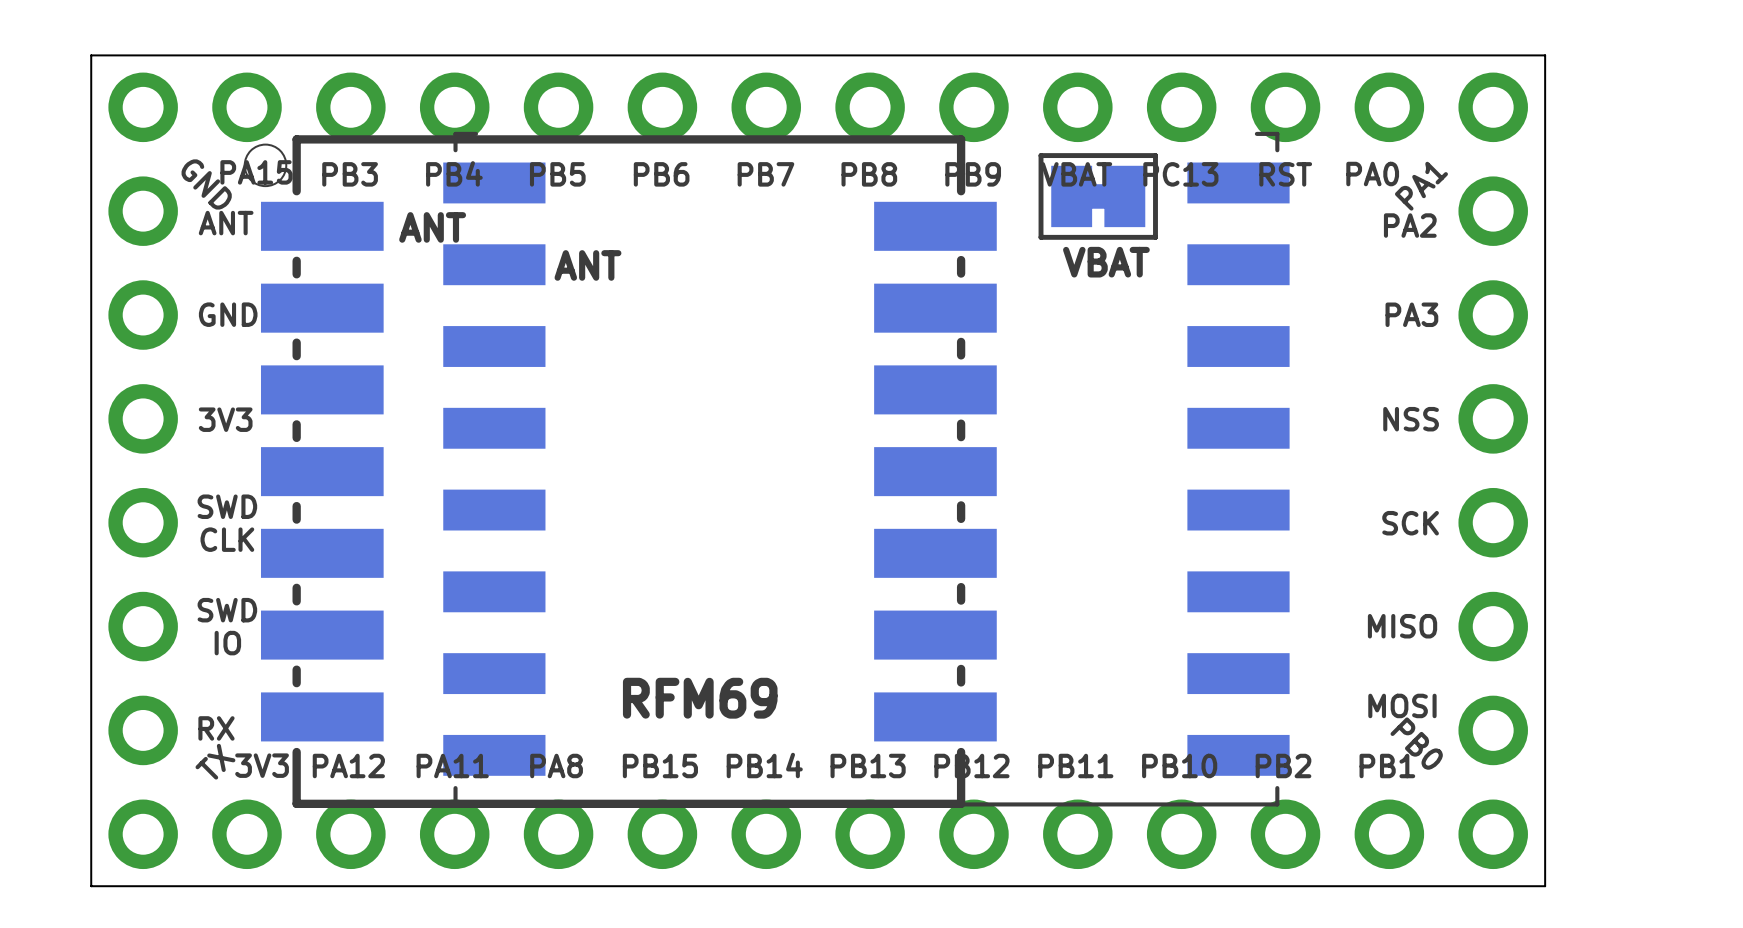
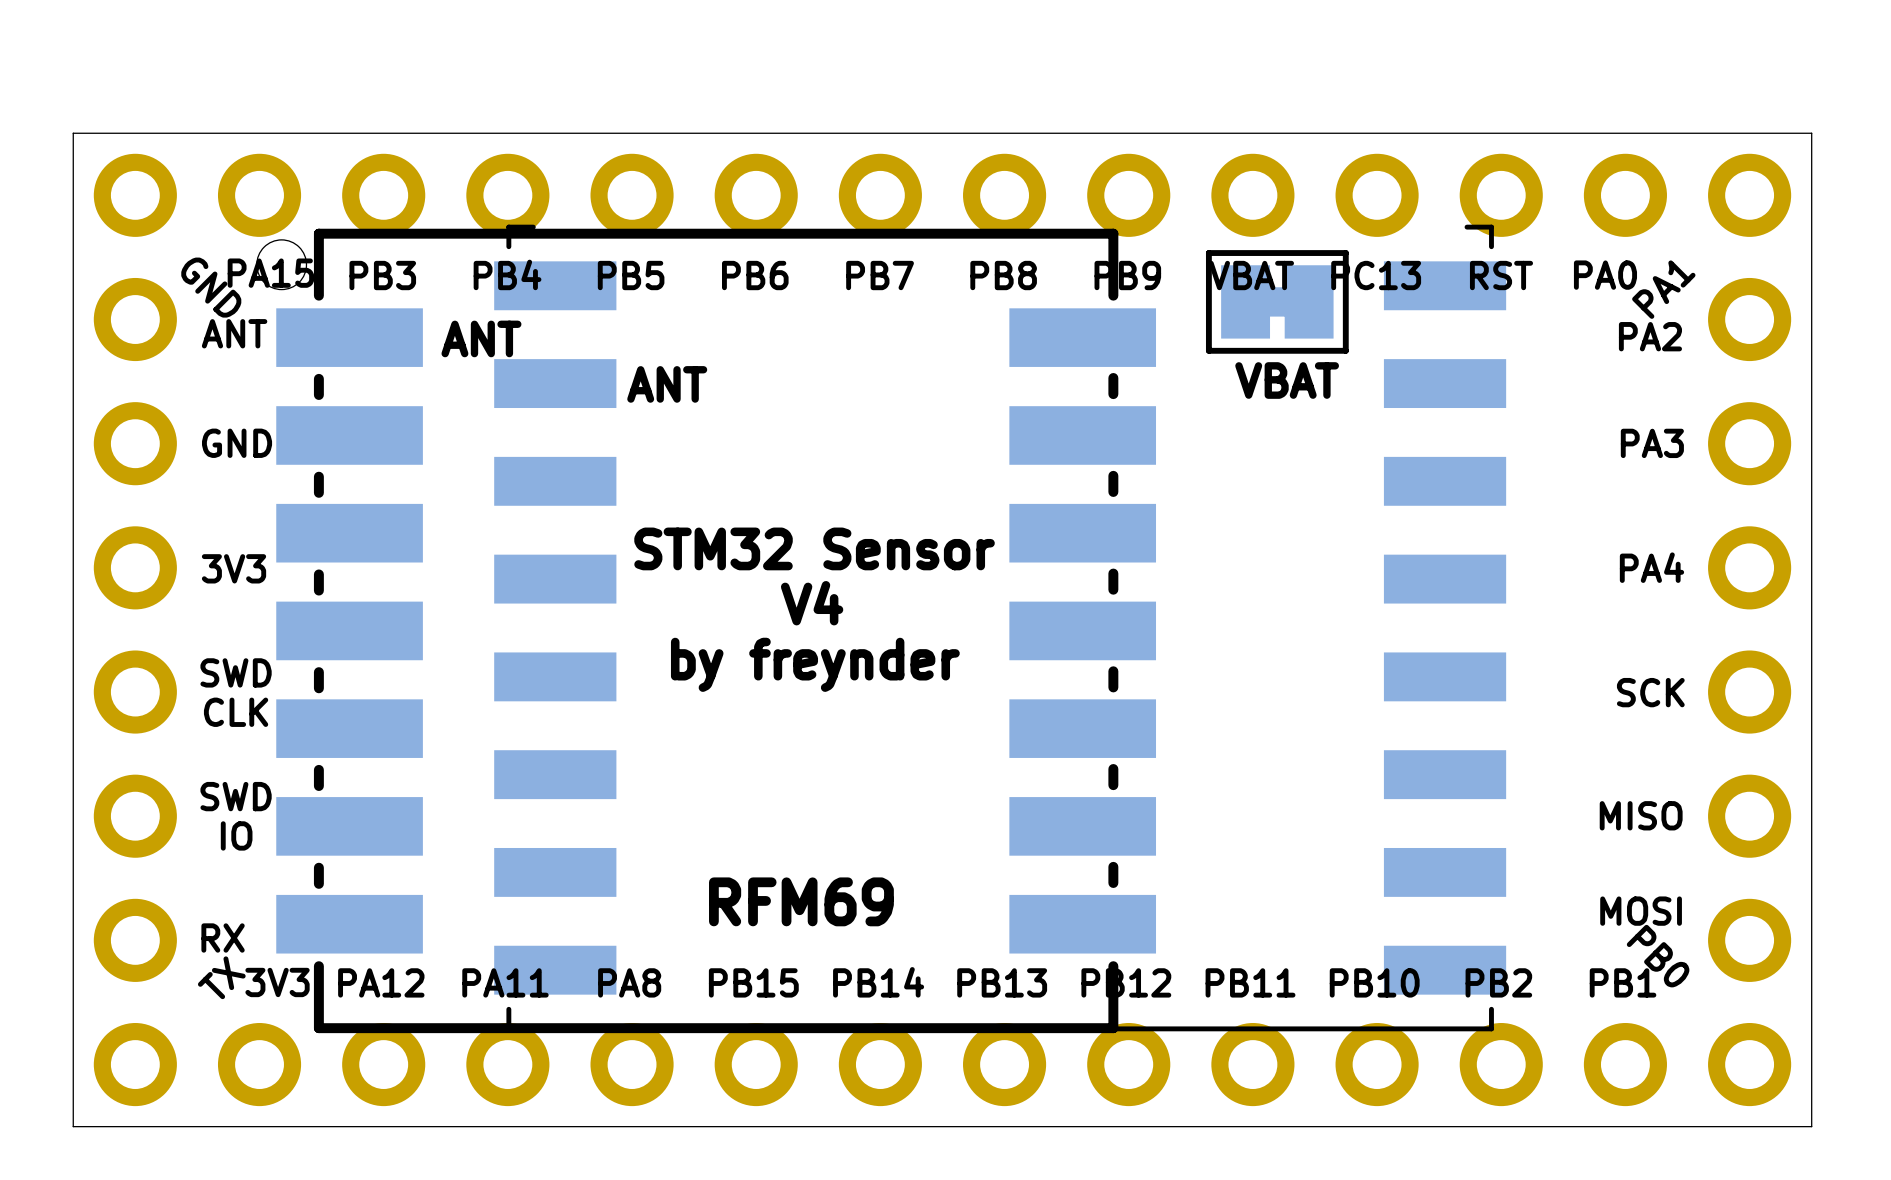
text: none -> STM32 Sensor (814, 548)
text: NSS (1411, 419) -> PA4 (1651, 567)
text: none -> V4 (812, 603)
text: none -> by freynder (815, 664)

